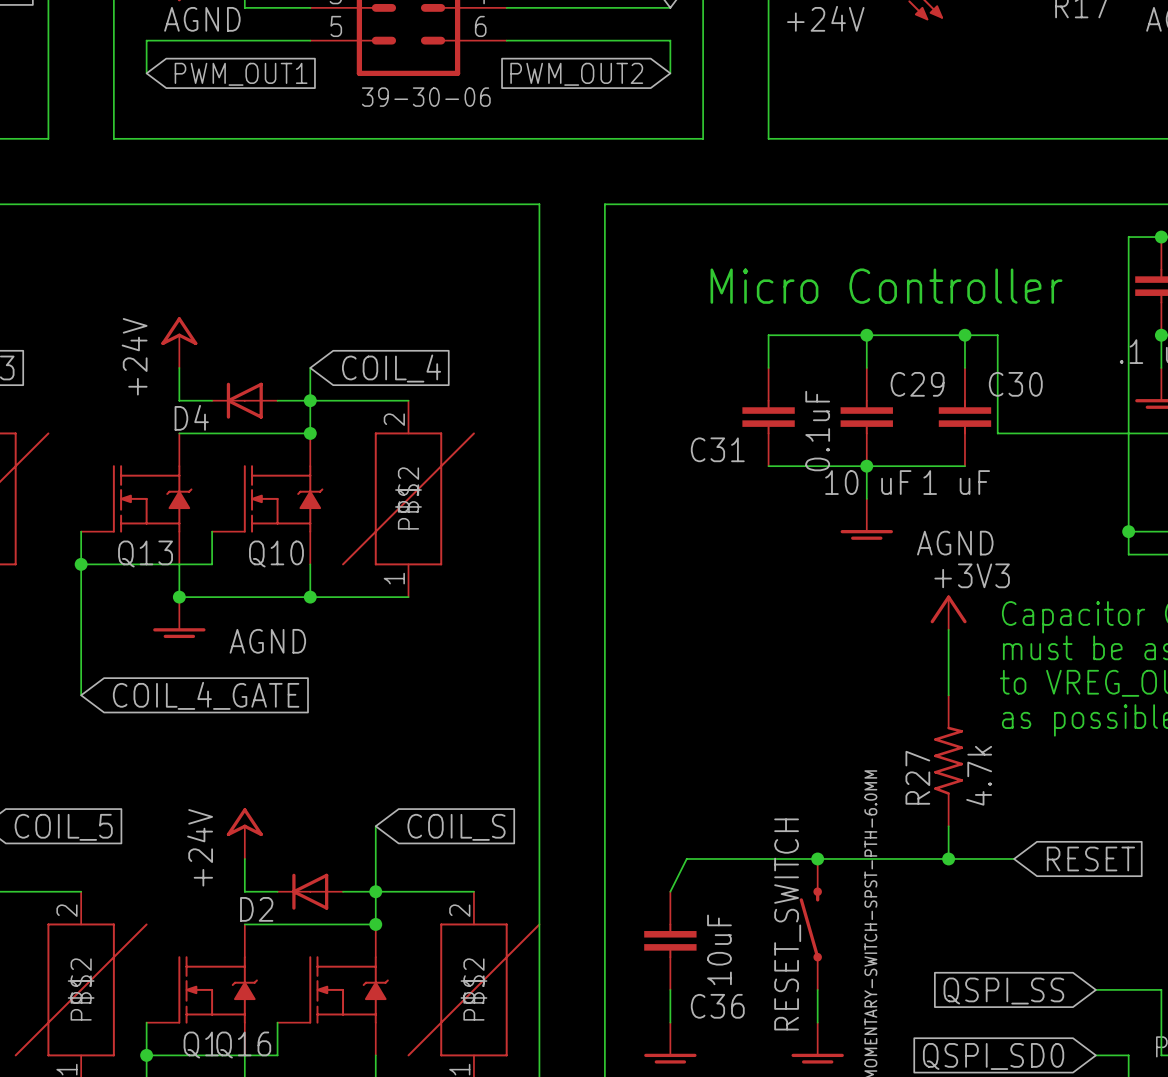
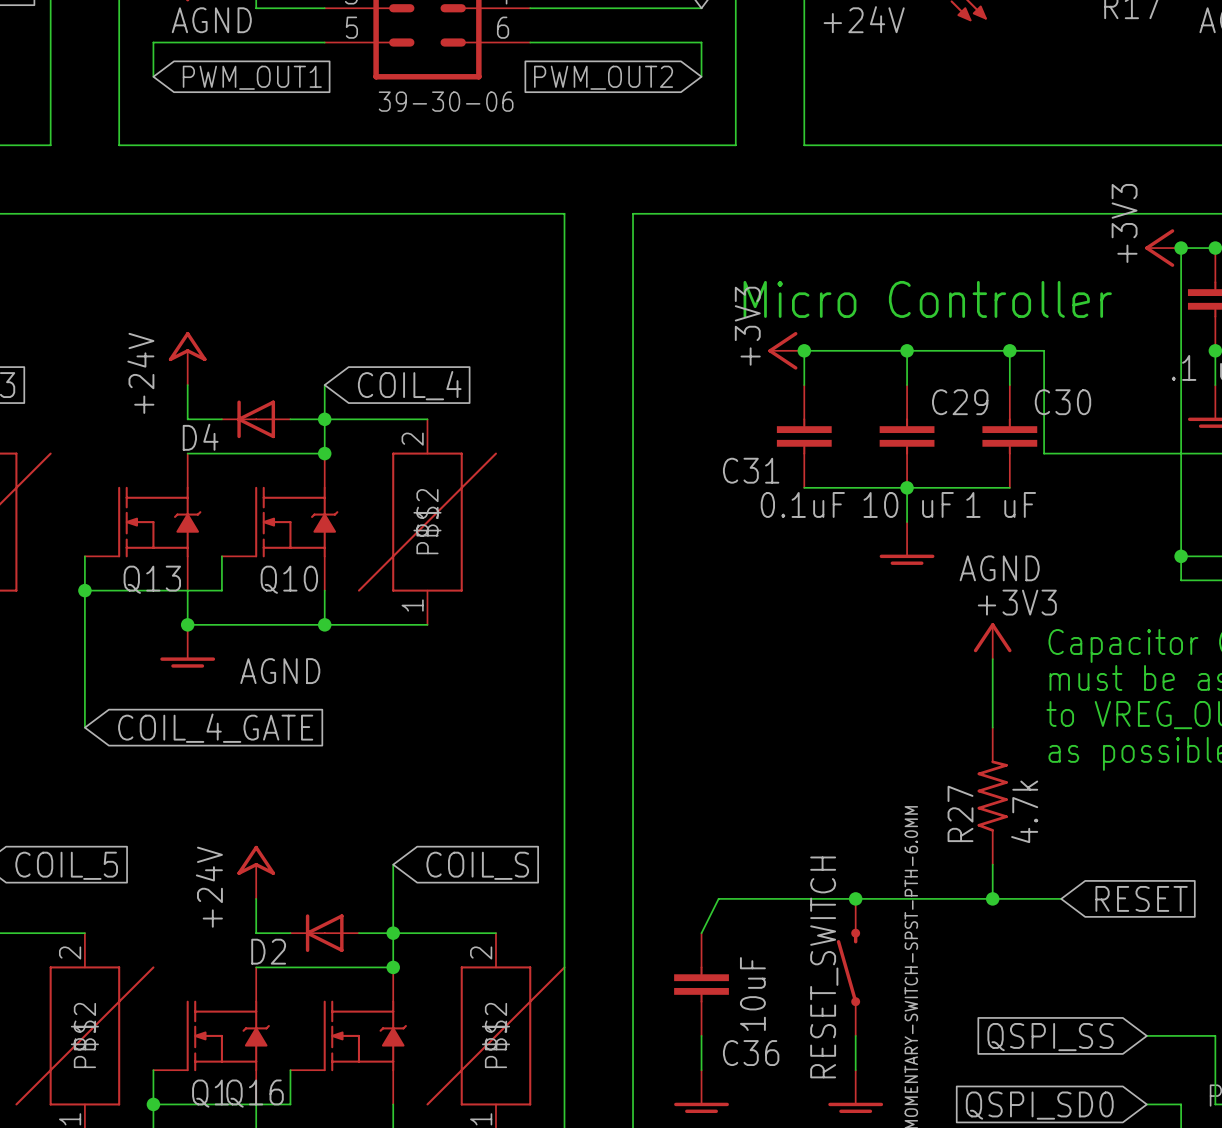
power symbol: none -> +3V3 (1163, 248)
junction: none -> (1181, 248)
power symbol: none -> +3V3 (786, 350)
junction: none -> (804, 350)
C31 value rotation: 0° (817, 431) -> 90° clockwise (802, 504)

